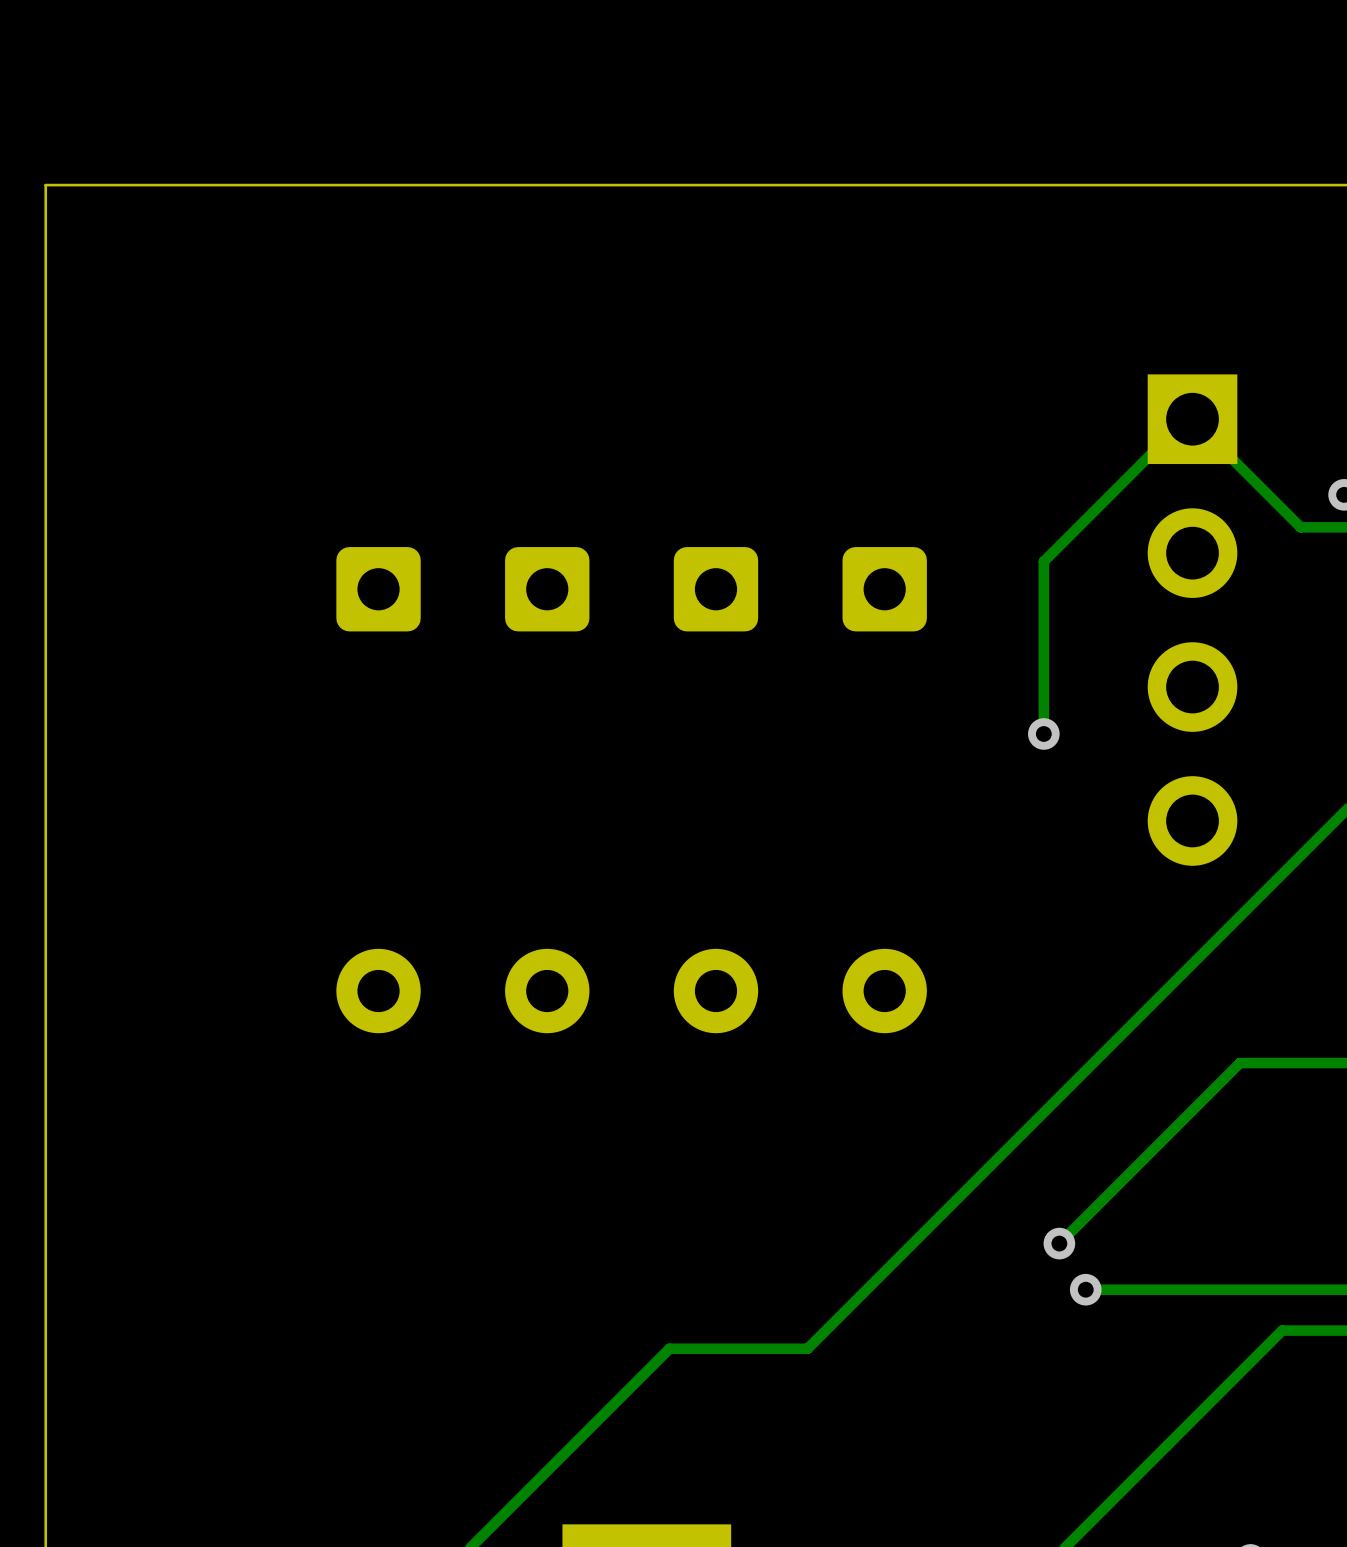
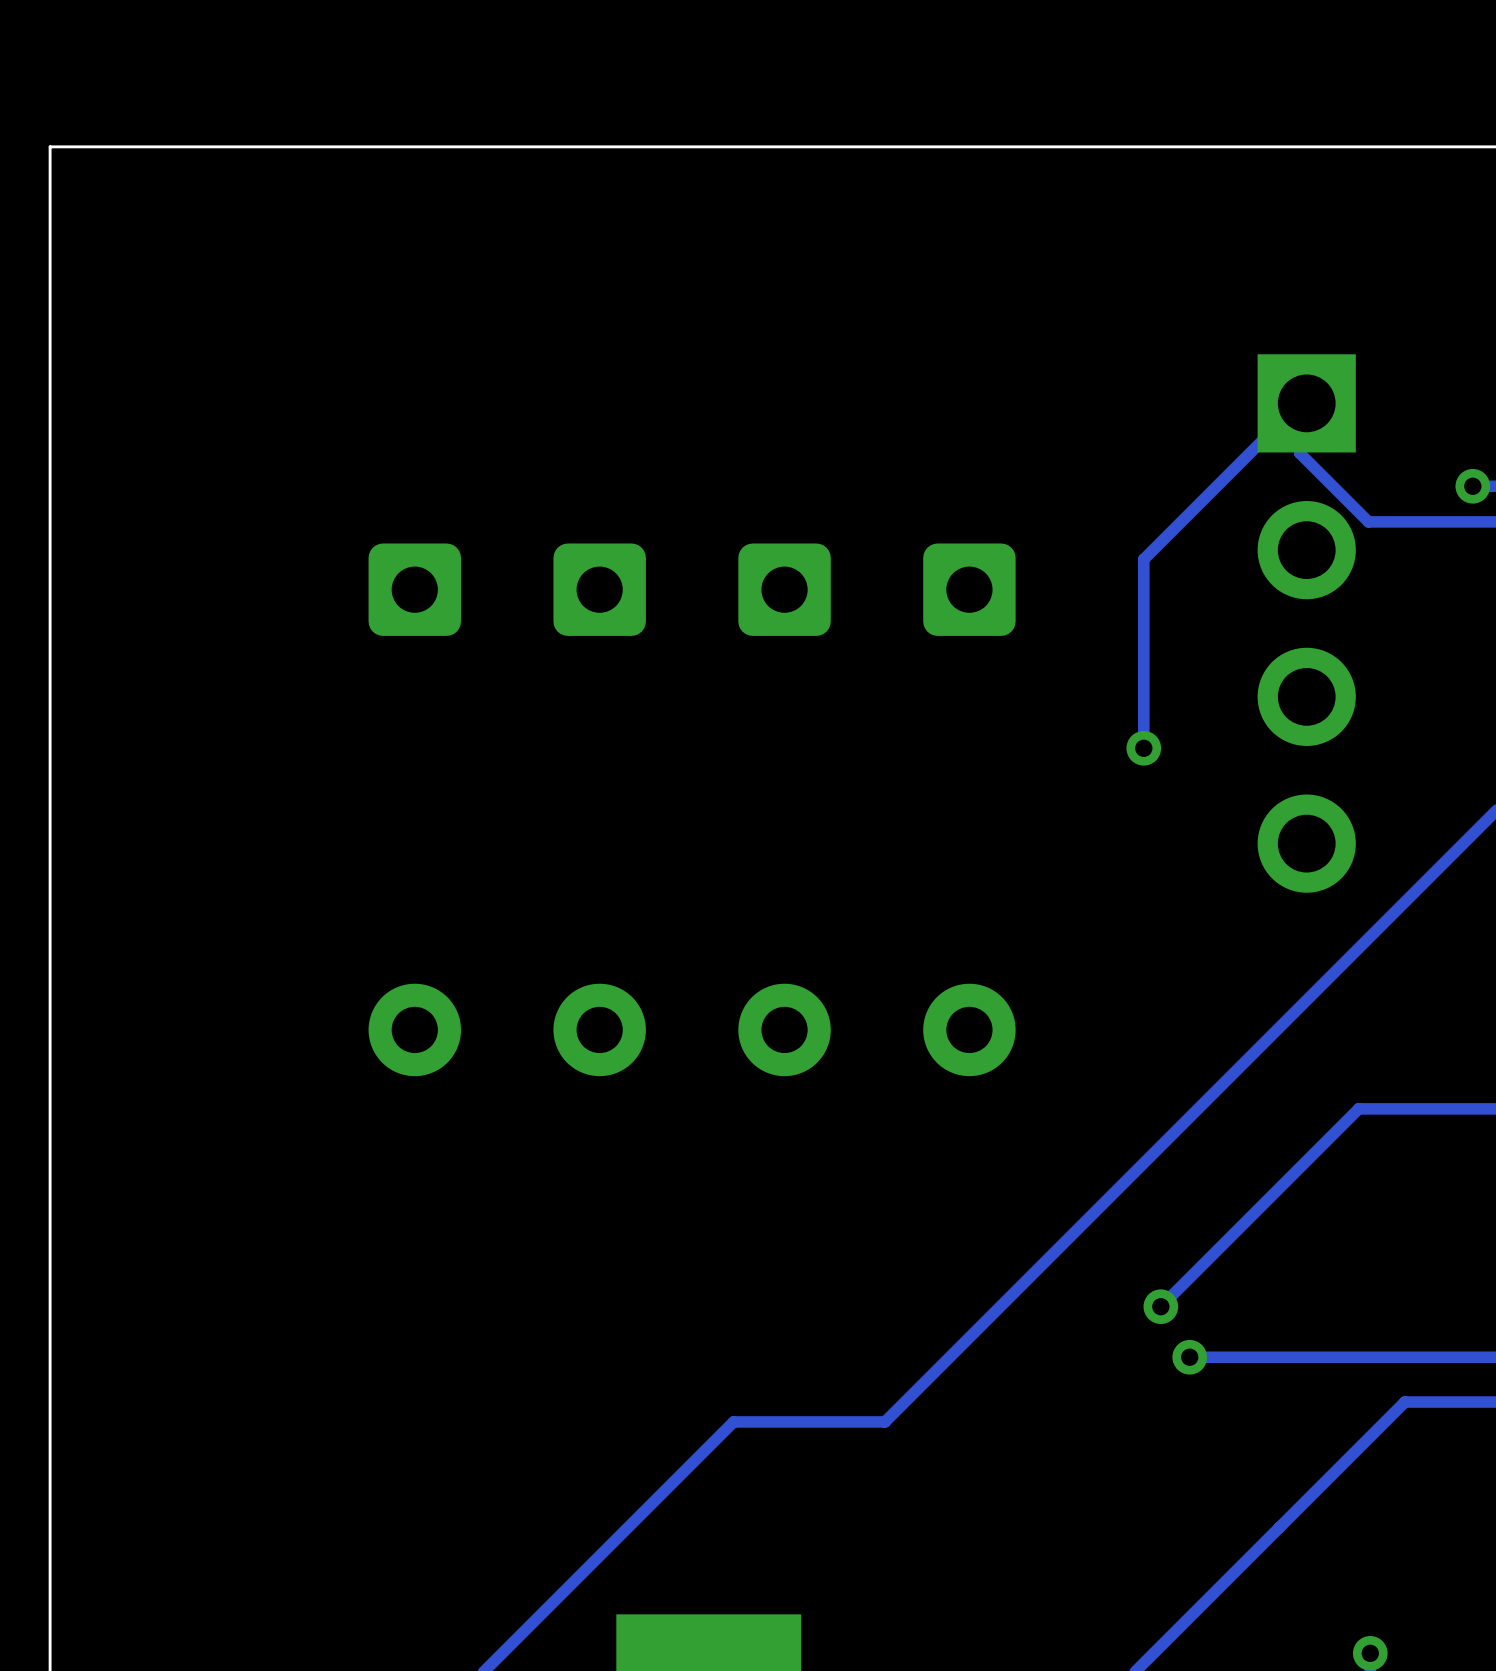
track: (1186, 419) (1192, 419) (1300, 527) -> (1299, 403) (1299, 453) (1368, 521) (1425, 521)

